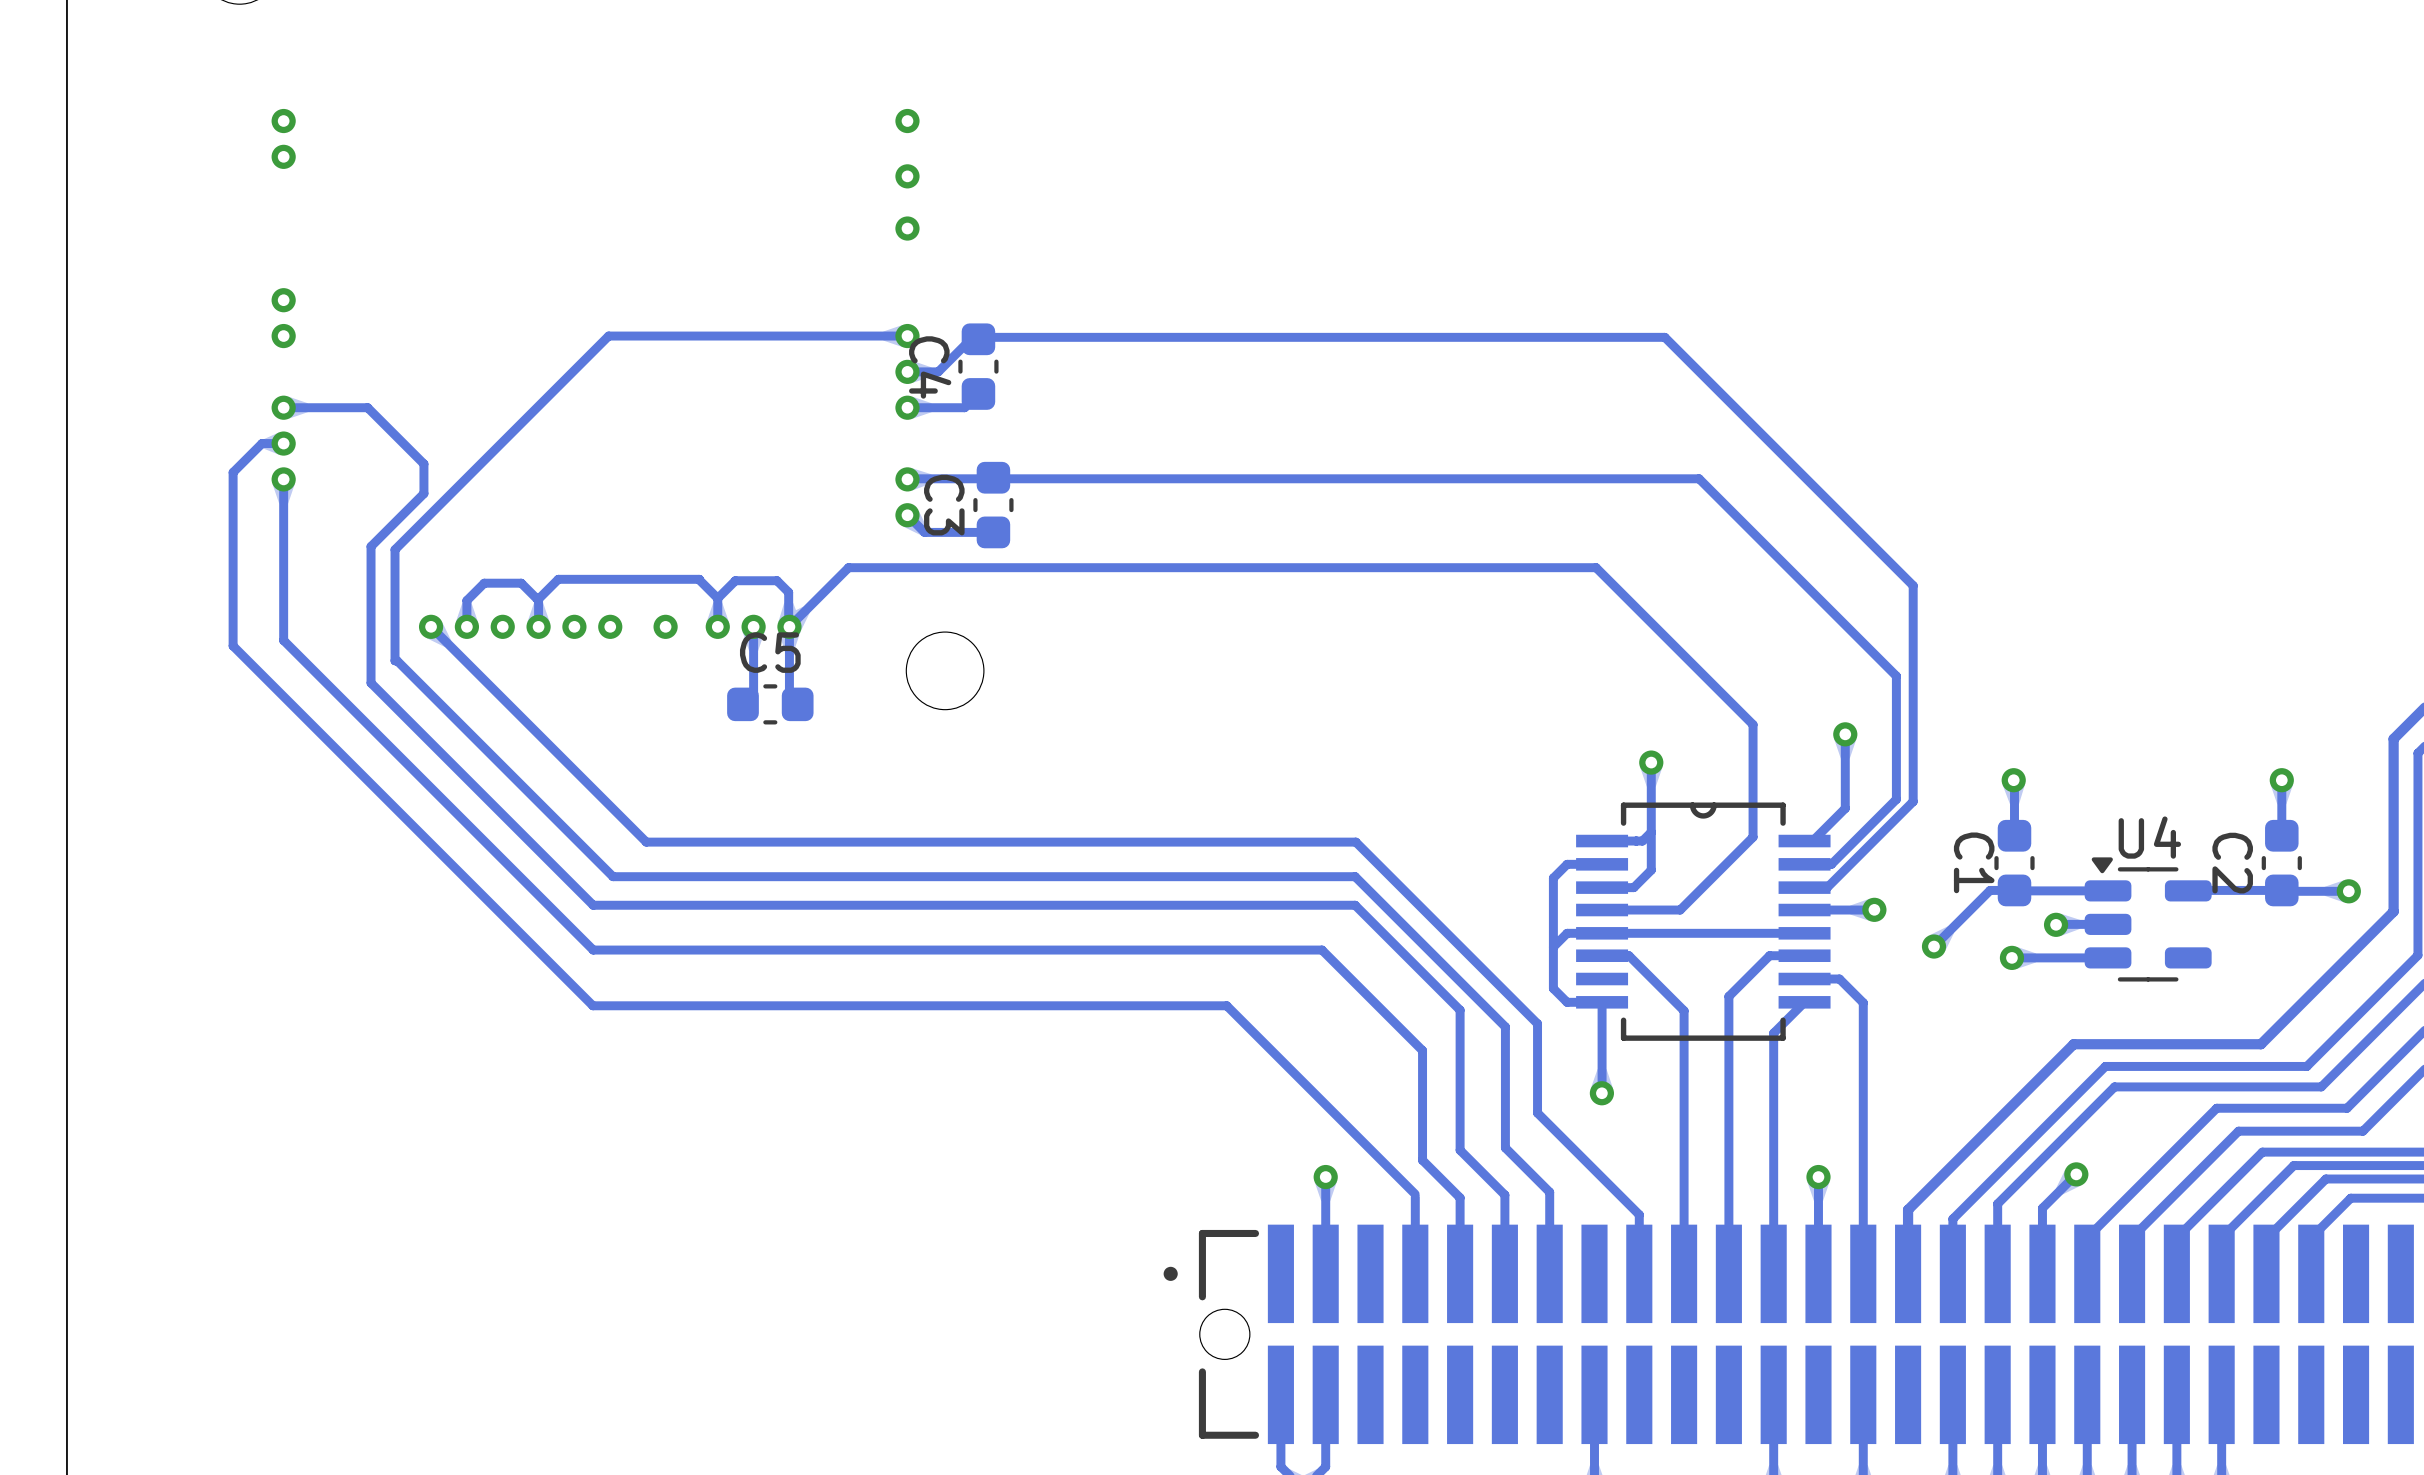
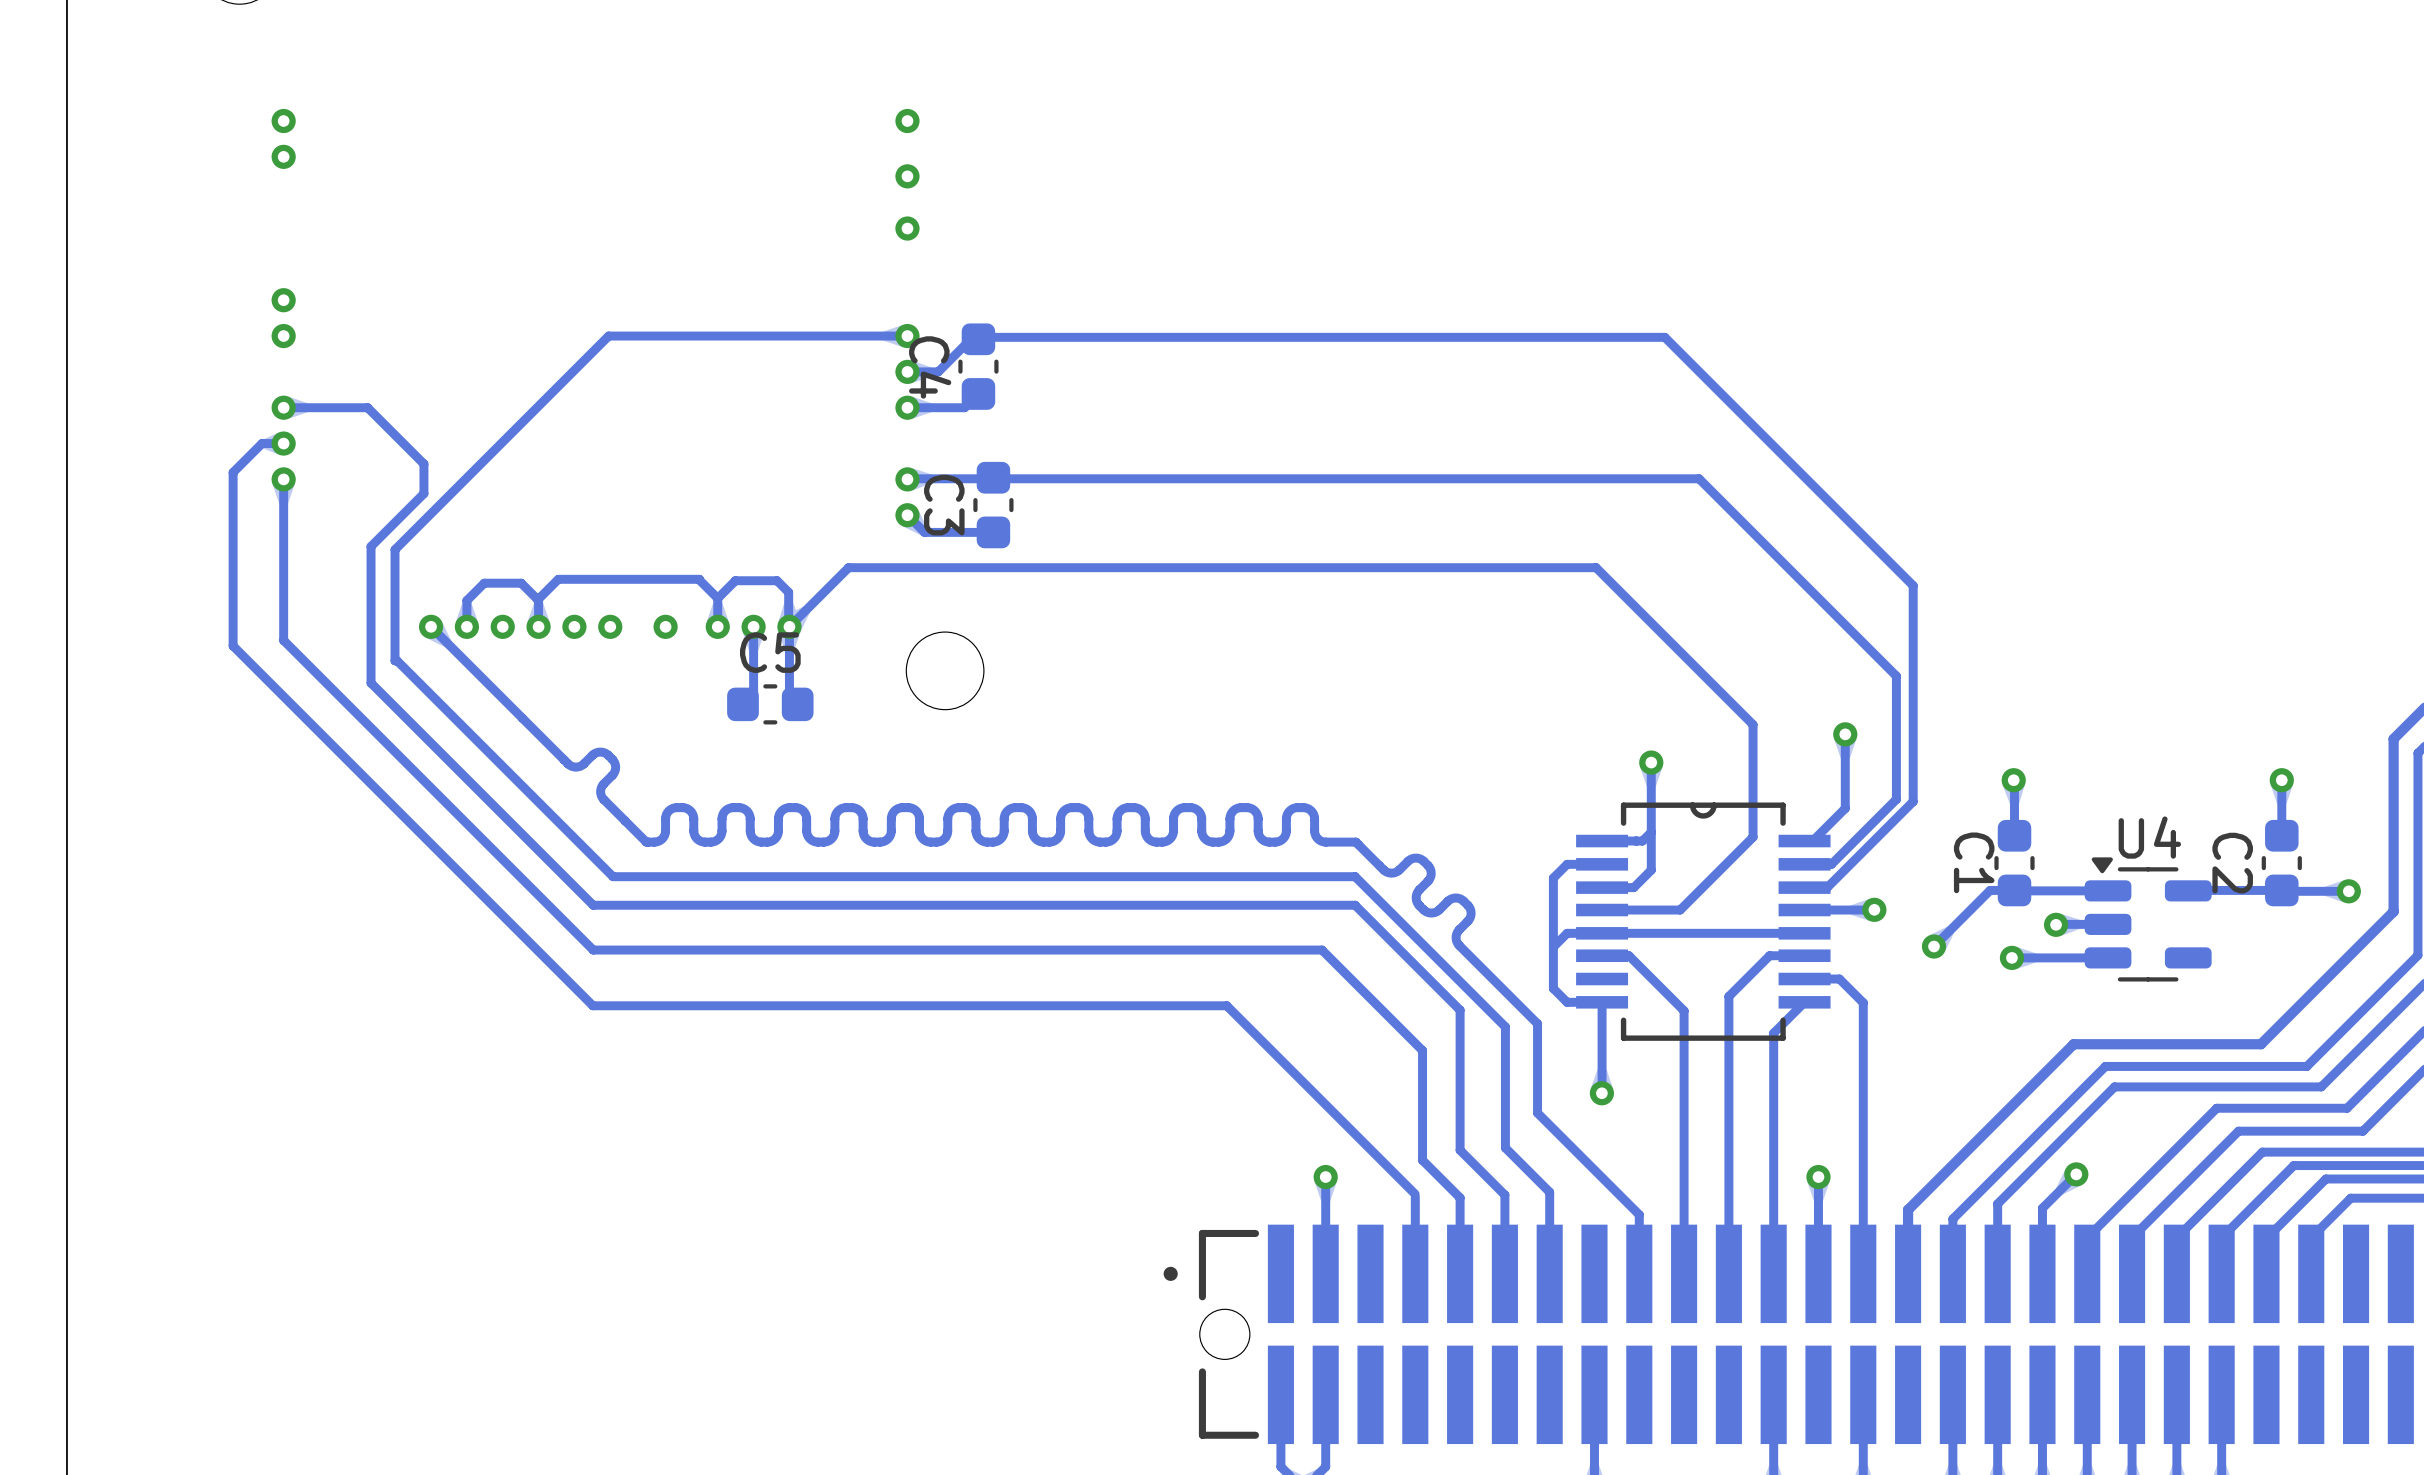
track: (568, 763) (603, 799) -> (568, 763) (573, 766) (579, 766) (593, 754) (599, 752) (605, 753) (612, 759) (615, 764) (614, 771) (600, 789) (603, 799)
track: (705, 842) (654, 842) -> (705, 842) (699, 840) (695, 836) (692, 814) (689, 809) (682, 807) (673, 808) (667, 812) (664, 835) (661, 839) (654, 842)
track: (761, 842) (710, 842) -> (761, 842) (754, 839) (751, 835) (748, 813) (744, 809) (738, 807) (730, 808) (724, 812) (721, 835) (717, 839) (710, 842)
track: (817, 842) (767, 842) -> (817, 842) (812, 840) (807, 835) (805, 813) (801, 809) (795, 807) (786, 808) (780, 812) (777, 835) (772, 840) (767, 842)
track: (874, 842) (823, 842) -> (874, 842) (868, 840) (864, 836) (862, 814) (858, 809) (851, 807) (843, 808) (837, 812) (834, 835) (829, 840) (823, 842)
track: (930, 842) (880, 842) -> (930, 842) (925, 840) (920, 835) (918, 813) (913, 809) (908, 807) (899, 808) (893, 812) (890, 835) (886, 839) (880, 842)
track: (987, 842) (936, 842) -> (987, 842) (981, 840) (976, 835) (974, 813) (970, 809) (964, 807) (956, 808) (950, 812) (946, 835) (943, 839) (936, 842)
track: (1043, 842) (992, 842) -> (1043, 842) (1038, 840) (1033, 836) (1031, 814) (1027, 809) (1021, 807) (1012, 808) (1006, 812) (1003, 835) (999, 839) (992, 842)
track: (1100, 842) (1049, 842) -> (1100, 842) (1093, 839) (1089, 835) (1087, 813) (1083, 809) (1077, 807) (1068, 808) (1062, 812) (1059, 835) (1056, 839) (1049, 842)
track: (1156, 842) (1105, 842) -> (1156, 842) (1149, 839) (1146, 835) (1143, 813) (1139, 809) (1134, 807) (1125, 808) (1119, 812) (1116, 835) (1112, 839) (1105, 842)
track: (1213, 842) (1162, 842) -> (1213, 842) (1207, 840) (1203, 836) (1200, 814) (1197, 809) (1190, 807) (1181, 808) (1175, 812) (1172, 835) (1169, 839) (1162, 842)
track: (1269, 842) (1218, 842) -> (1269, 842) (1263, 840) (1259, 836) (1257, 814) (1253, 809) (1246, 807) (1238, 808) (1232, 812) (1229, 835) (1225, 839) (1218, 842)
track: (1325, 842) (1275, 842) -> (1325, 842) (1320, 840) (1316, 836) (1313, 814) (1310, 809) (1303, 807) (1294, 808) (1288, 812) (1285, 835) (1281, 839) (1275, 842)
track: (1383, 869) (1419, 905) -> (1383, 869) (1389, 872) (1395, 872) (1408, 860) (1414, 858) (1420, 859) (1427, 865) (1431, 871) (1430, 877) (1416, 895) (1419, 905)
track: (1423, 909) (1459, 945) -> (1423, 909) (1428, 912) (1435, 912) (1448, 900) (1454, 898) (1460, 899) (1467, 905) (1470, 915) (1456, 933) (1456, 940) (1459, 945)

